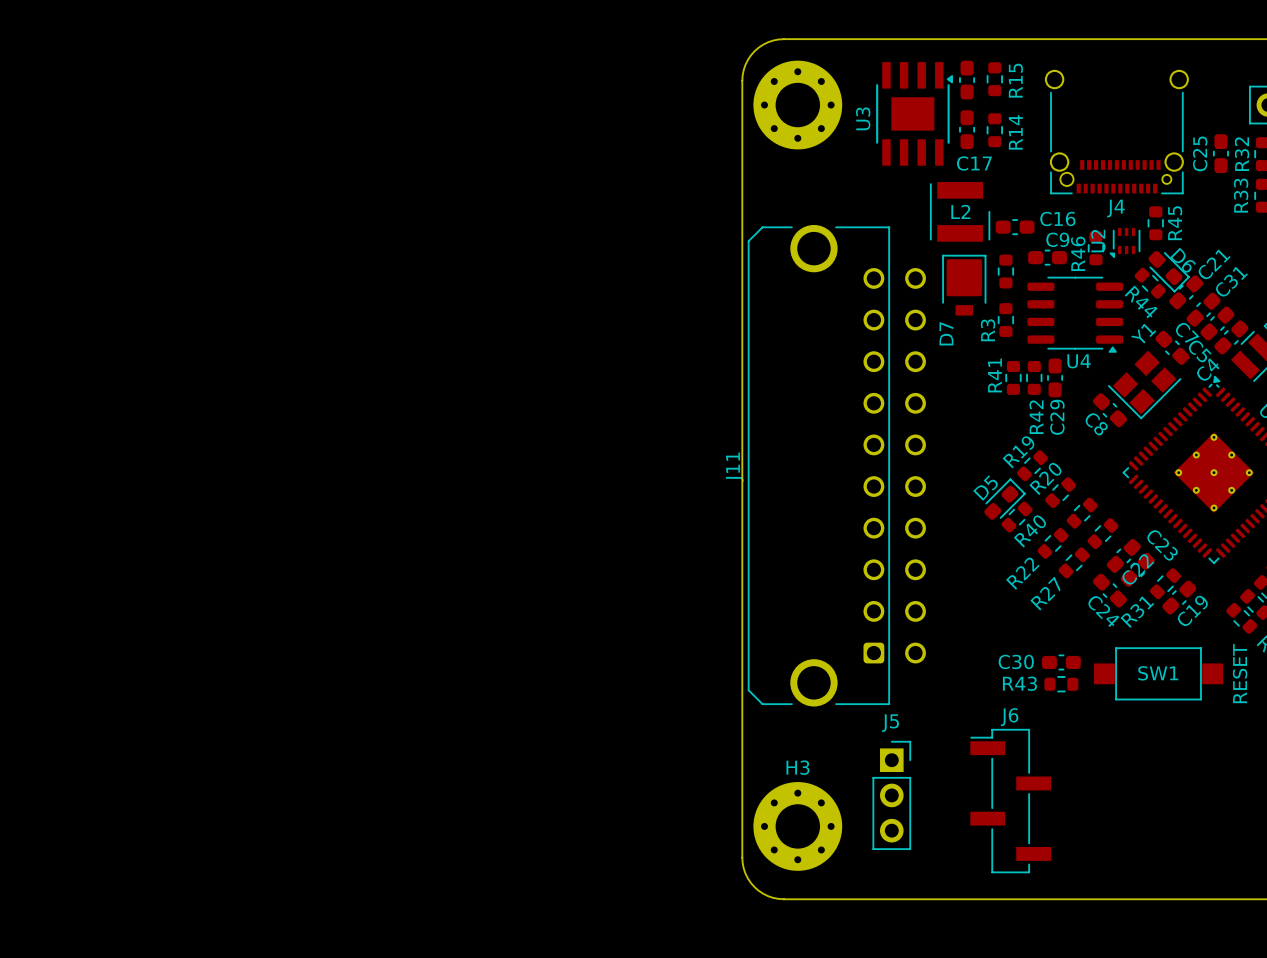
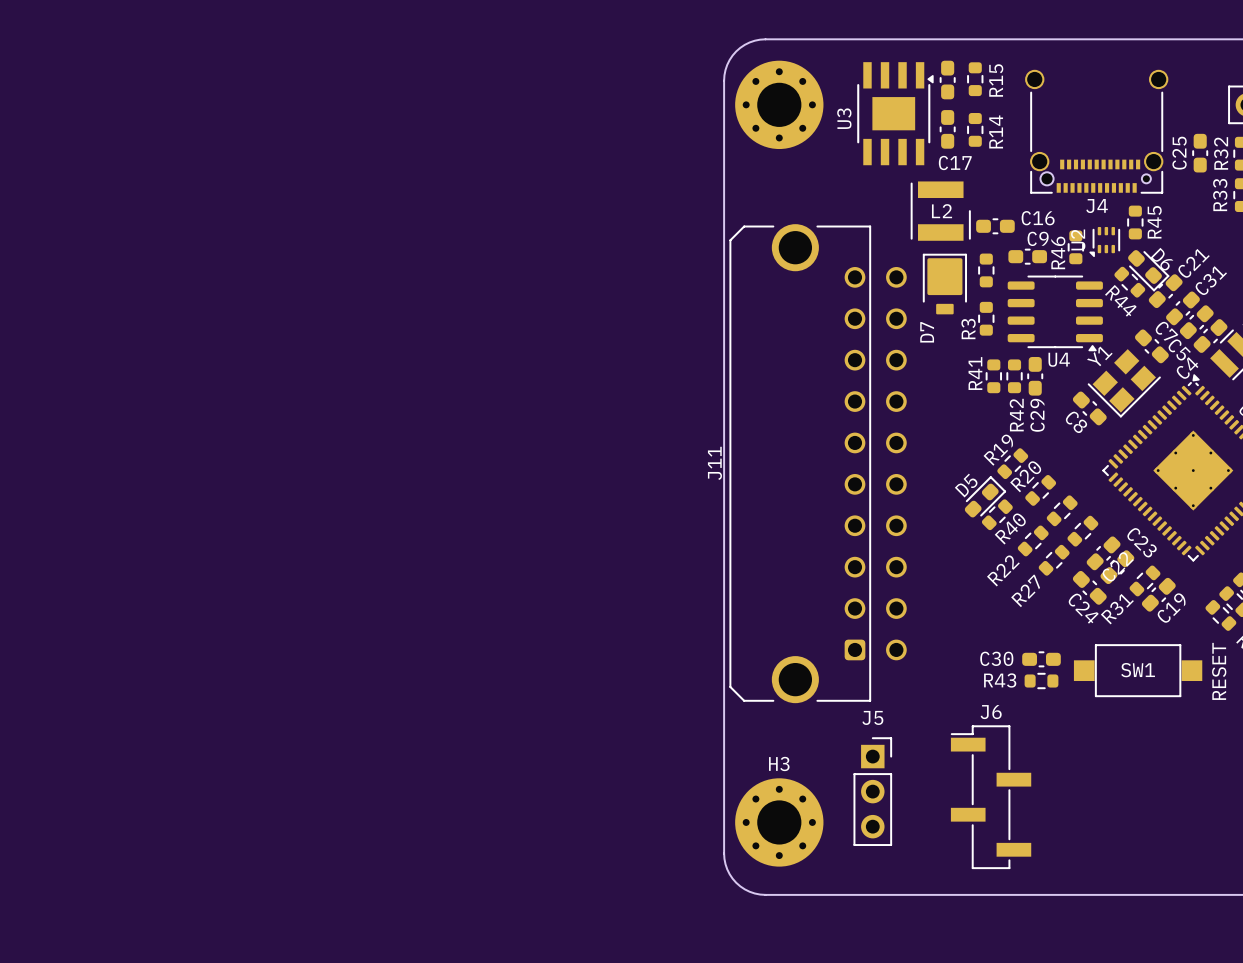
Y1 name position: Y1 (1143, 333) -> Y1 (1099, 356)

